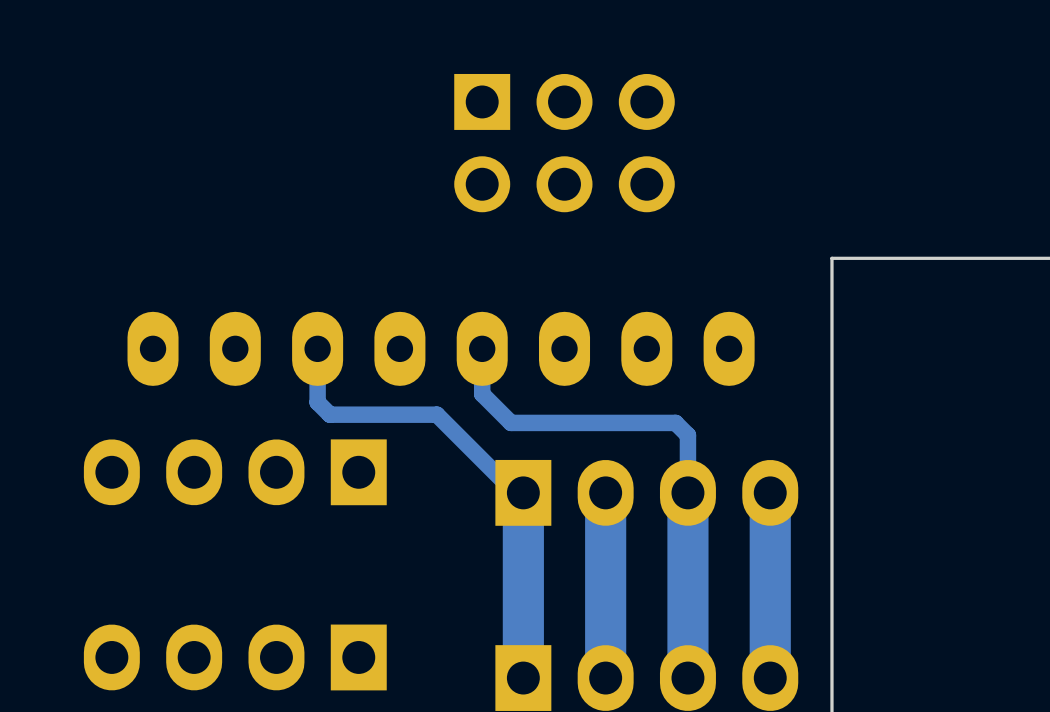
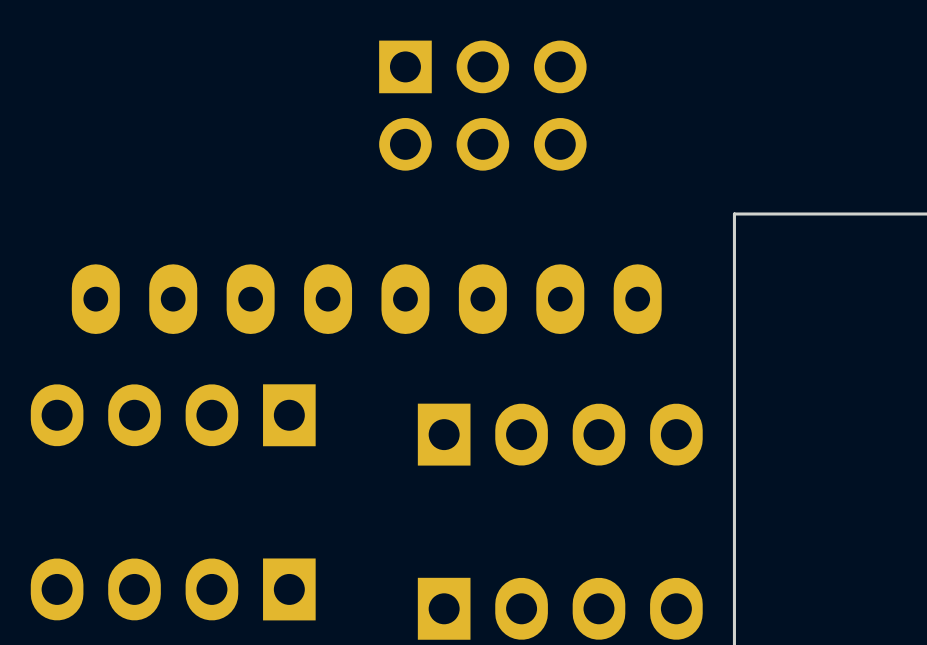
track: (317, 348) (317, 402) (329, 414) (436, 414) (515, 492) (523, 492) (523, 678) -> none
track: (482, 348) (482, 394) (511, 422) (675, 422) (687, 435) (687, 678) -> none
track: (605, 492) (605, 678) -> none
track: (770, 492) (770, 678) -> none

